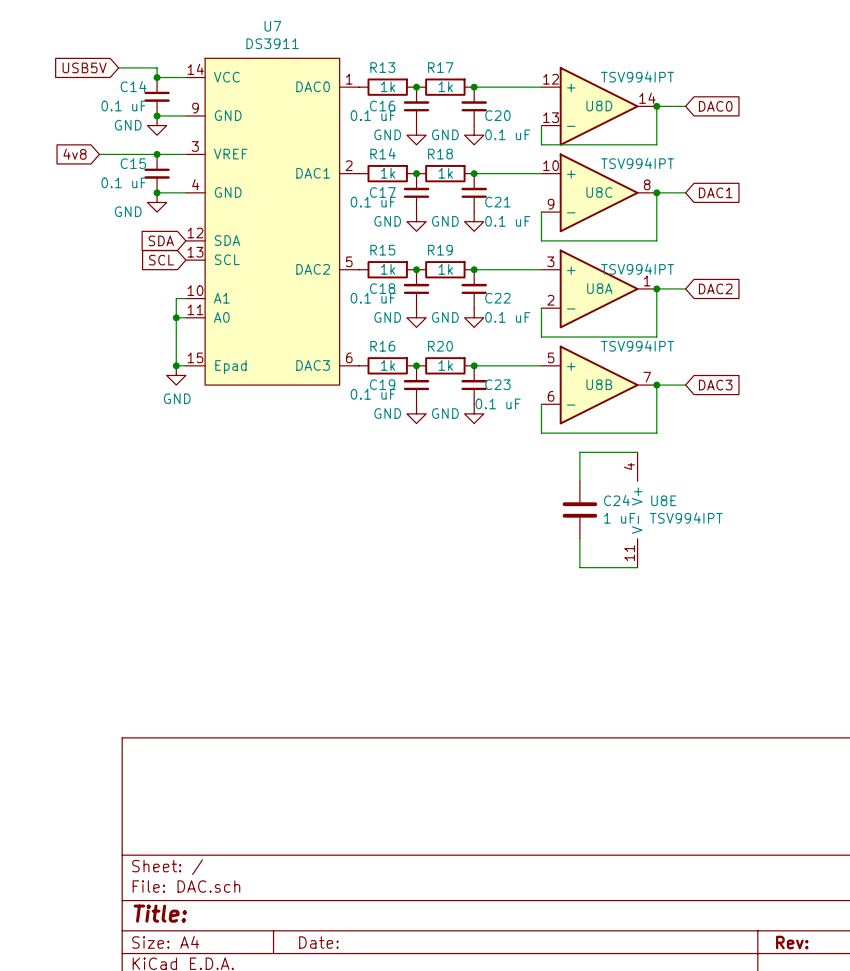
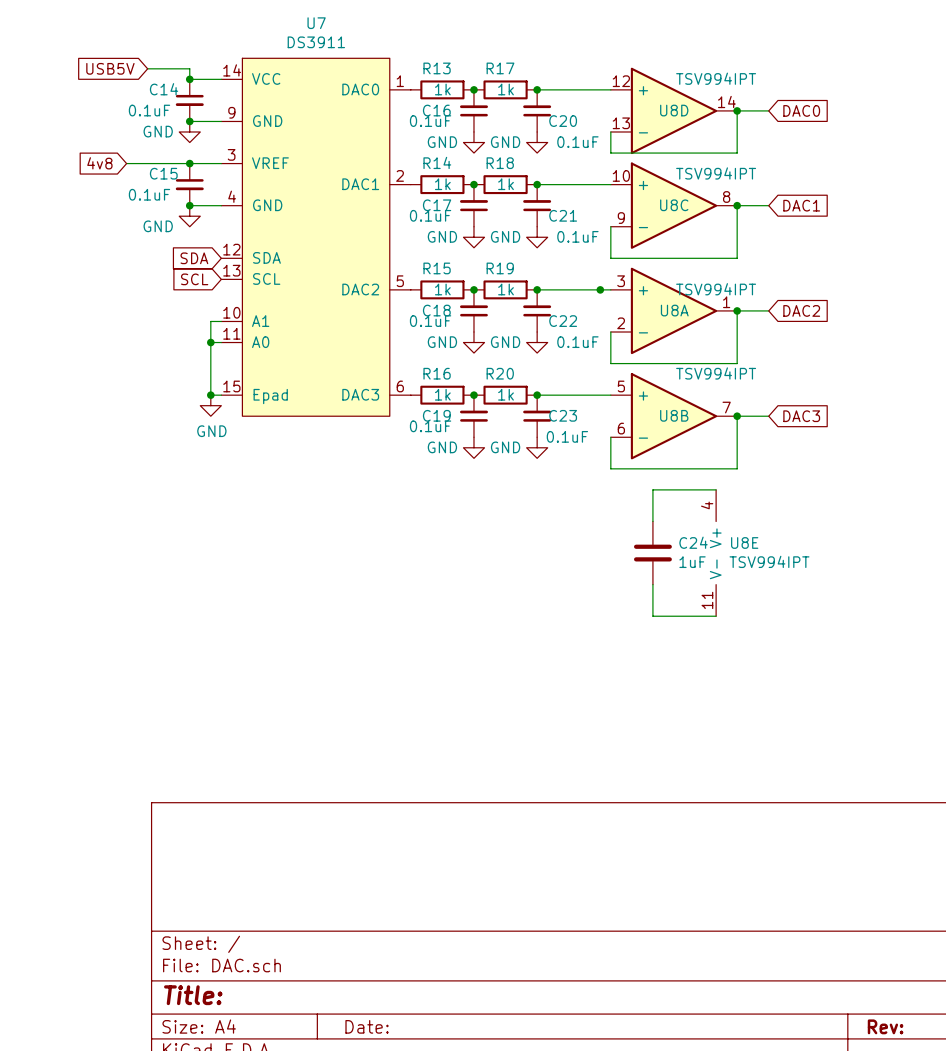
C14 value: 0.1 uF (123, 106) -> 0.1uF (149, 110)
C16 value: 0.1 uF (373, 115) -> 0.1uF (430, 121)
C20 value: 0.1 uF (507, 134) -> 0.1uF (577, 142)
C15 value: 0.1 uF (123, 182) -> 0.1uF (149, 194)
C17 value: 0.1 uF (373, 202) -> 0.1uF (430, 215)
C21 value: 0.1 uF (507, 221) -> 0.1uF (577, 236)
junction: none -> (600, 289)
C18 value: 0.1 uF (373, 298) -> 0.1uF (430, 321)
C22 value: 0.1 uF (507, 317) -> 0.1uF (577, 342)
C19 value: 0.1 uF (373, 394) -> 0.1uF (430, 426)
C23 value: 0.1 uF (498, 403) -> 0.1uF (567, 436)
C24 value: 1 uF (619, 518) -> 1uF (692, 562)

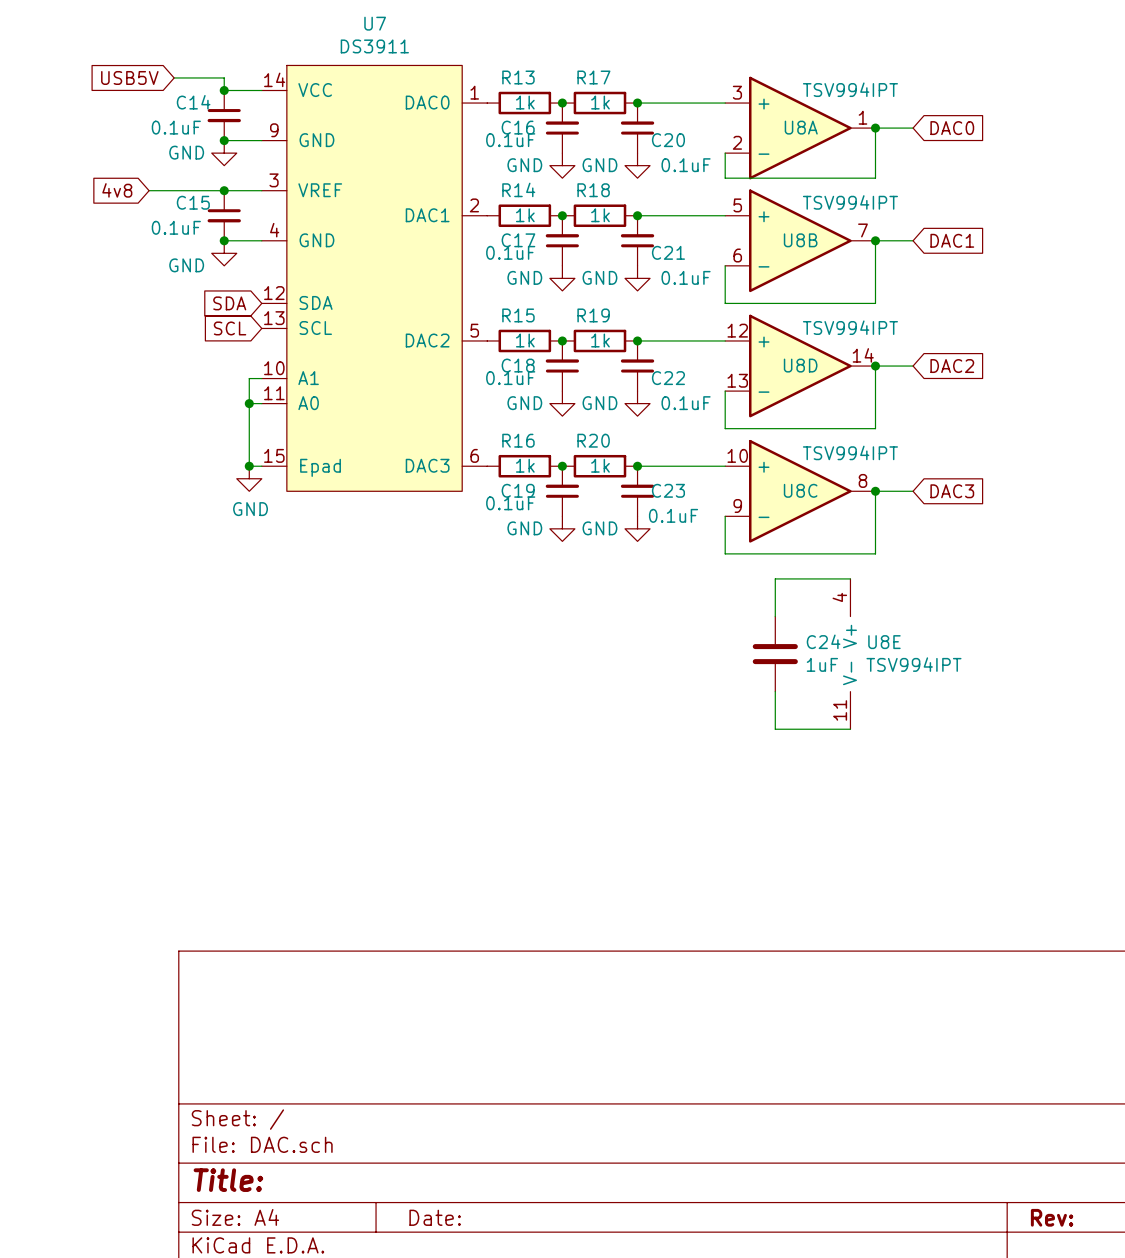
U8D position: (674, 110) -> (800, 366)
U8C position: (674, 205) -> (800, 491)
junction: (600, 289) -> none
U8A position: (674, 310) -> (800, 128)
U8B position: (674, 416) -> (800, 240)

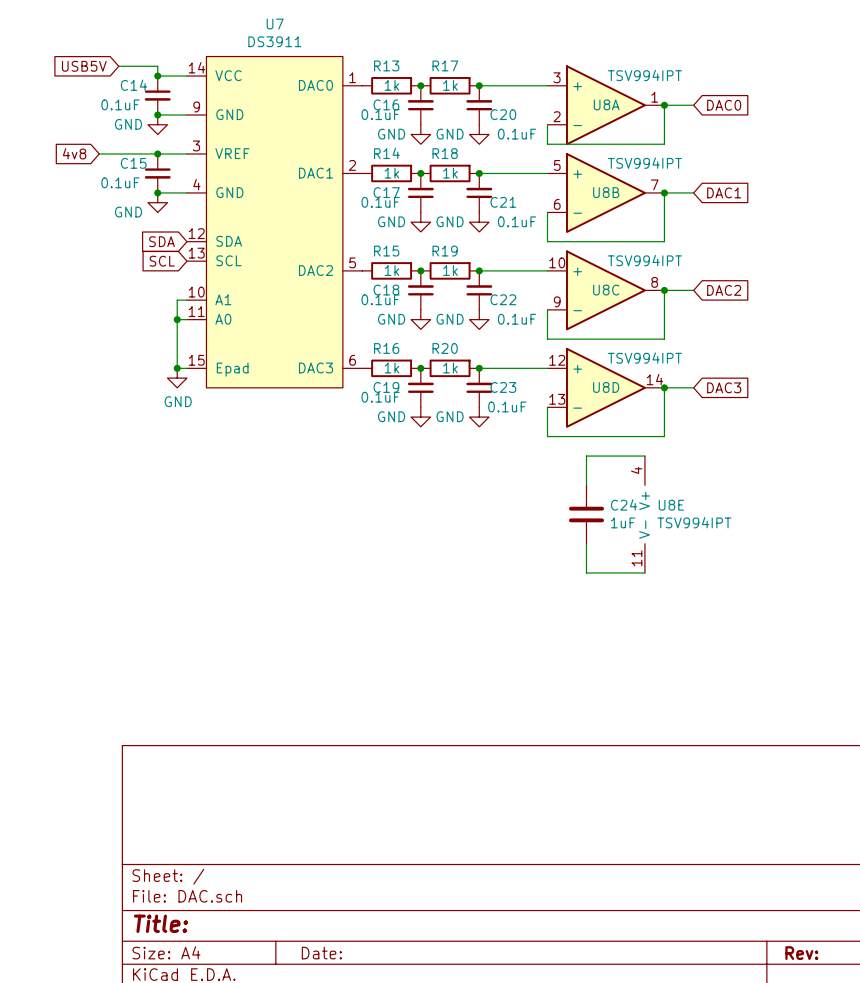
U8D position: (800, 366) -> (605, 387)
U8C position: (800, 491) -> (605, 290)

